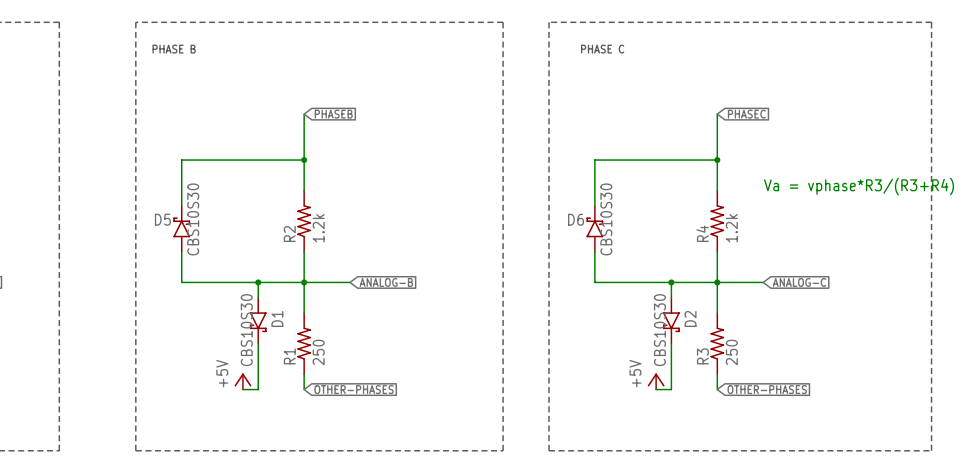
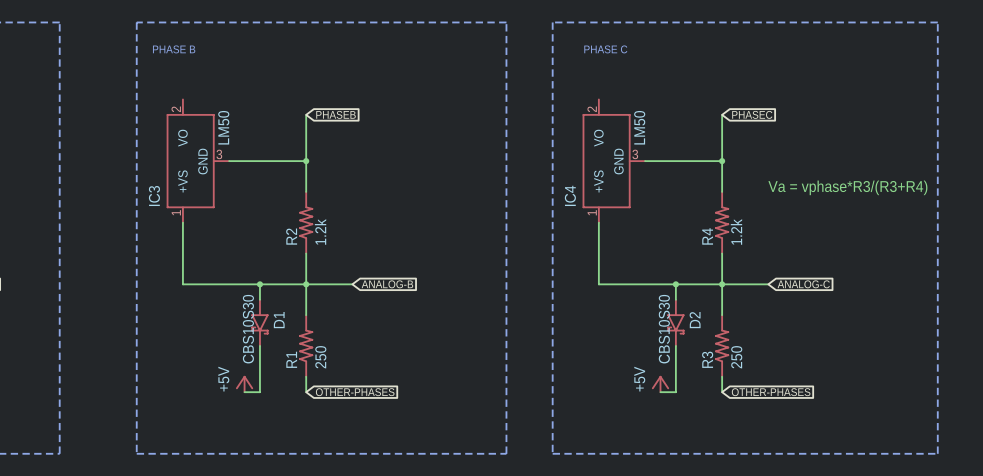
IC3: none -> LM50 (197, 161)
wire: (227, 160) (181, 160) (181, 205) -> none
IC4: none -> LM50 (613, 161)
wire: (640, 160) (594, 160) (594, 205) -> none
D5: CBS10S30 (181, 228) -> none
D6: CBS10S30 (594, 228) -> none

